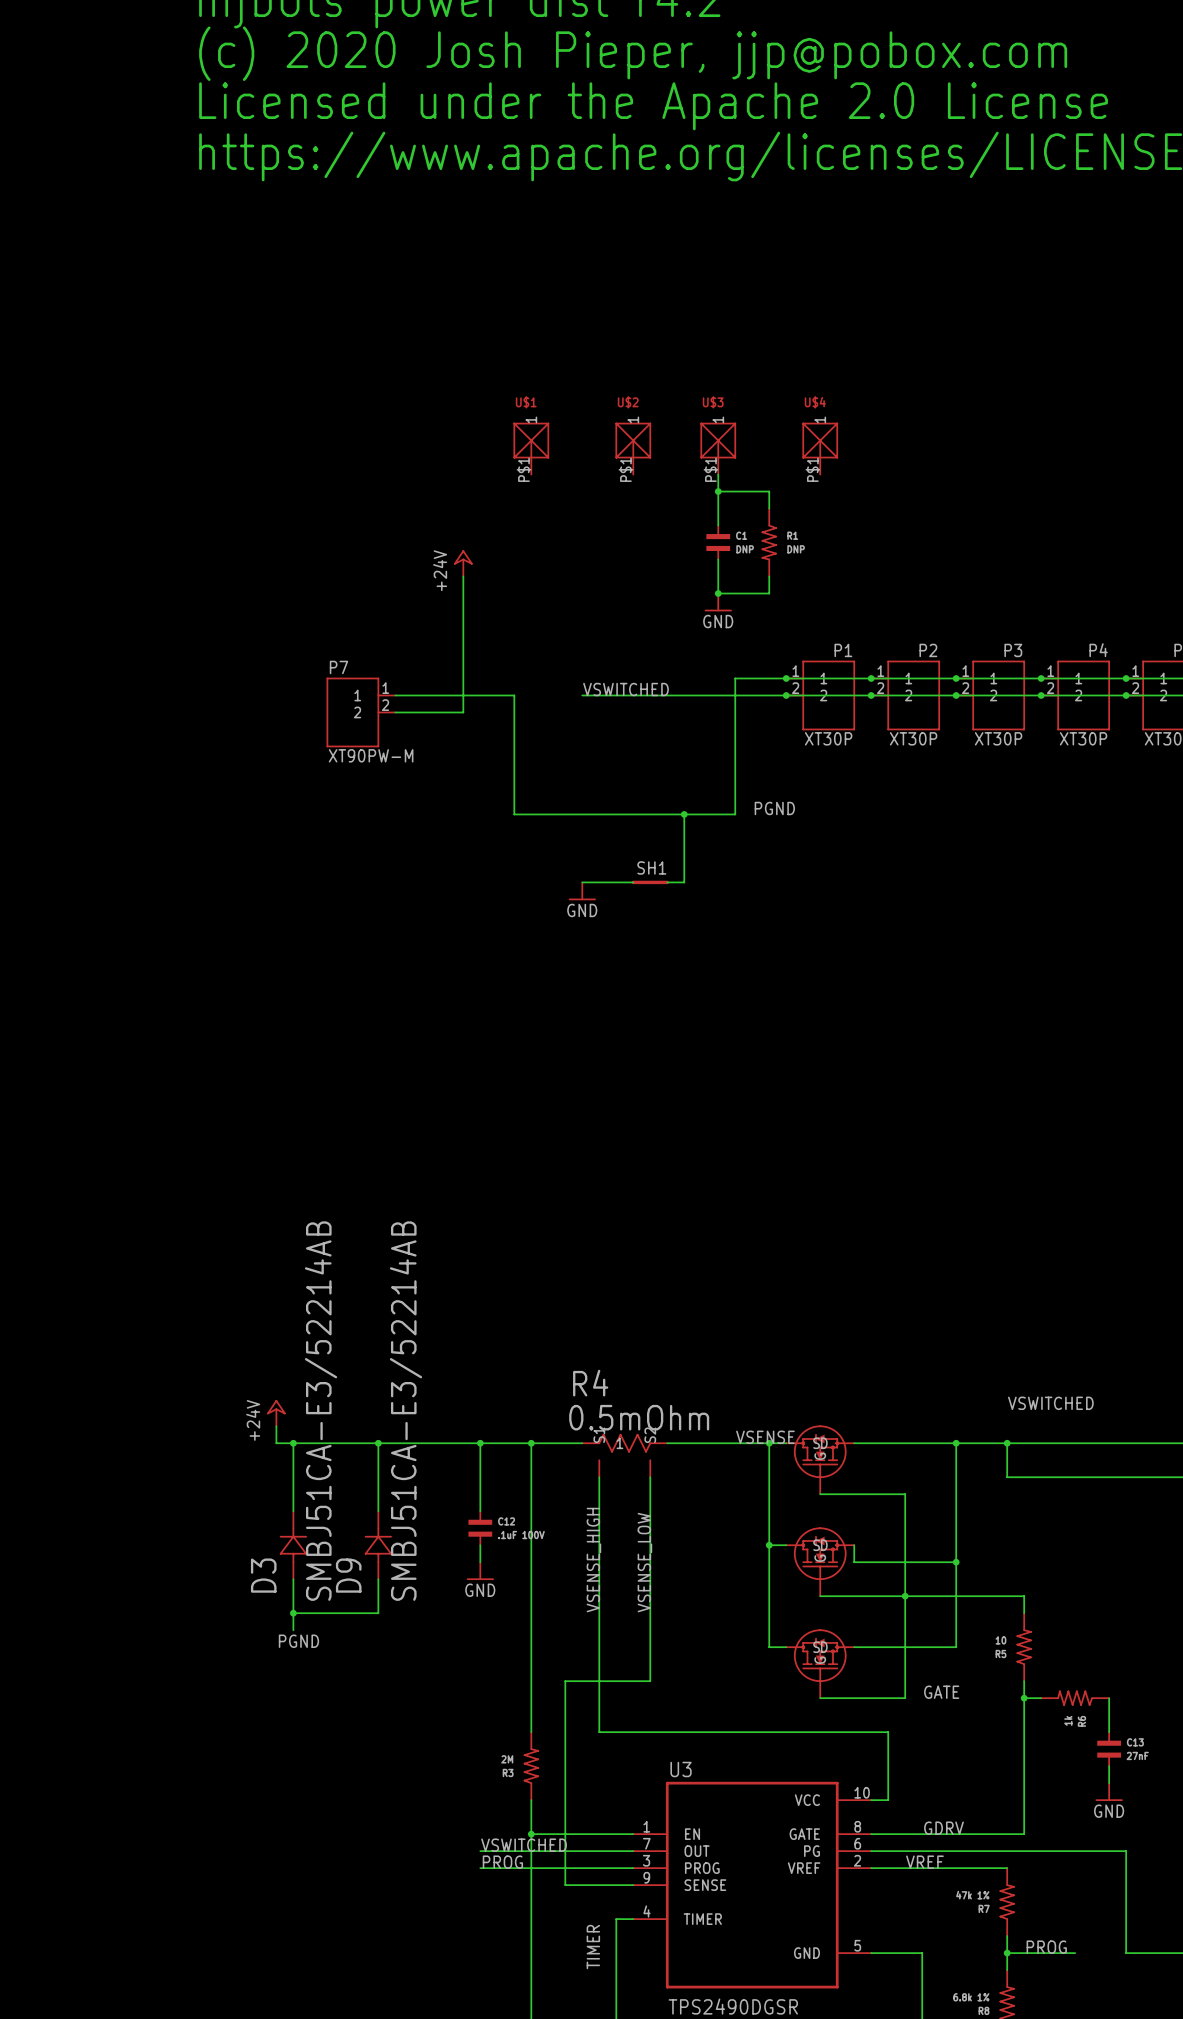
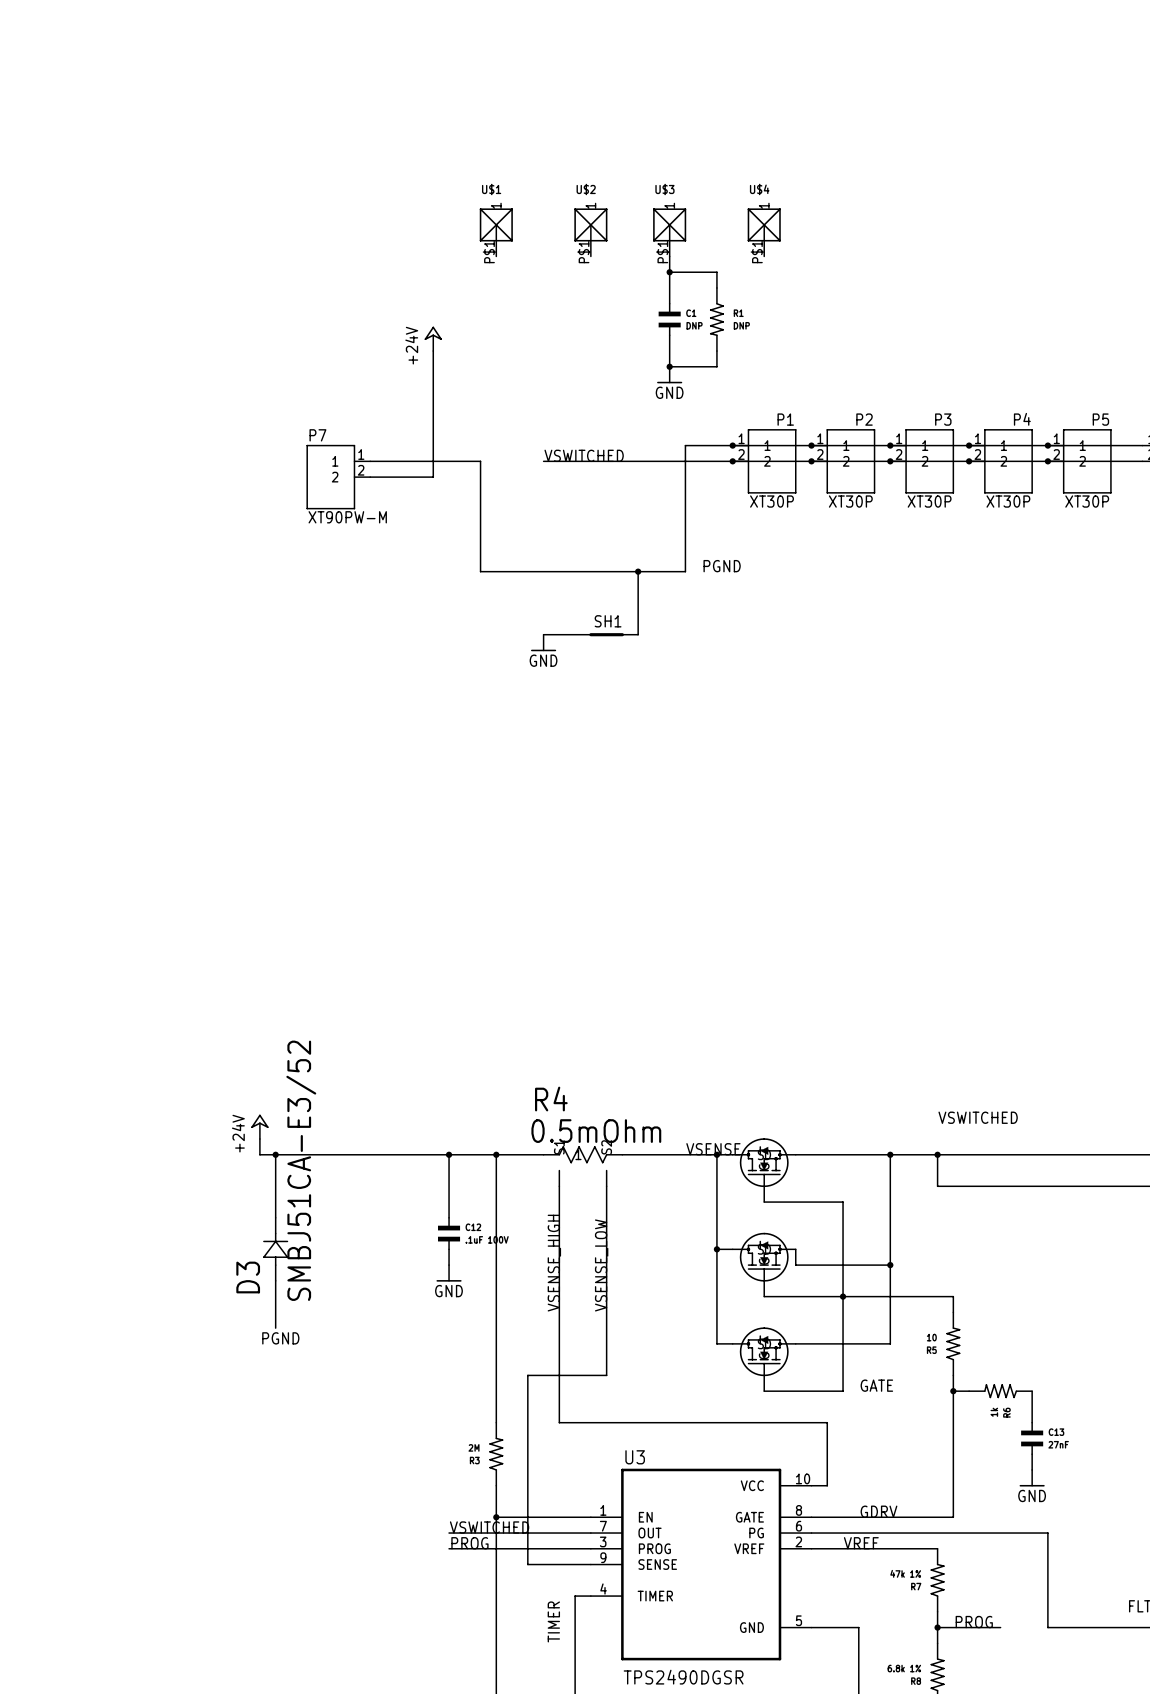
D3 value: SMBJ51CA-E3/52214AB (321, 1411) -> SMBJ51CA-E3/52 (301, 1170)
wire: (378, 1443) (378, 1511) -> none
junction: (378, 1443) -> none
D9: SMBJ51CA-E3/52214AB (378, 1545) -> none
wire: (378, 1579) (378, 1613) (293, 1613) -> none
junction: (293, 1613) -> none

